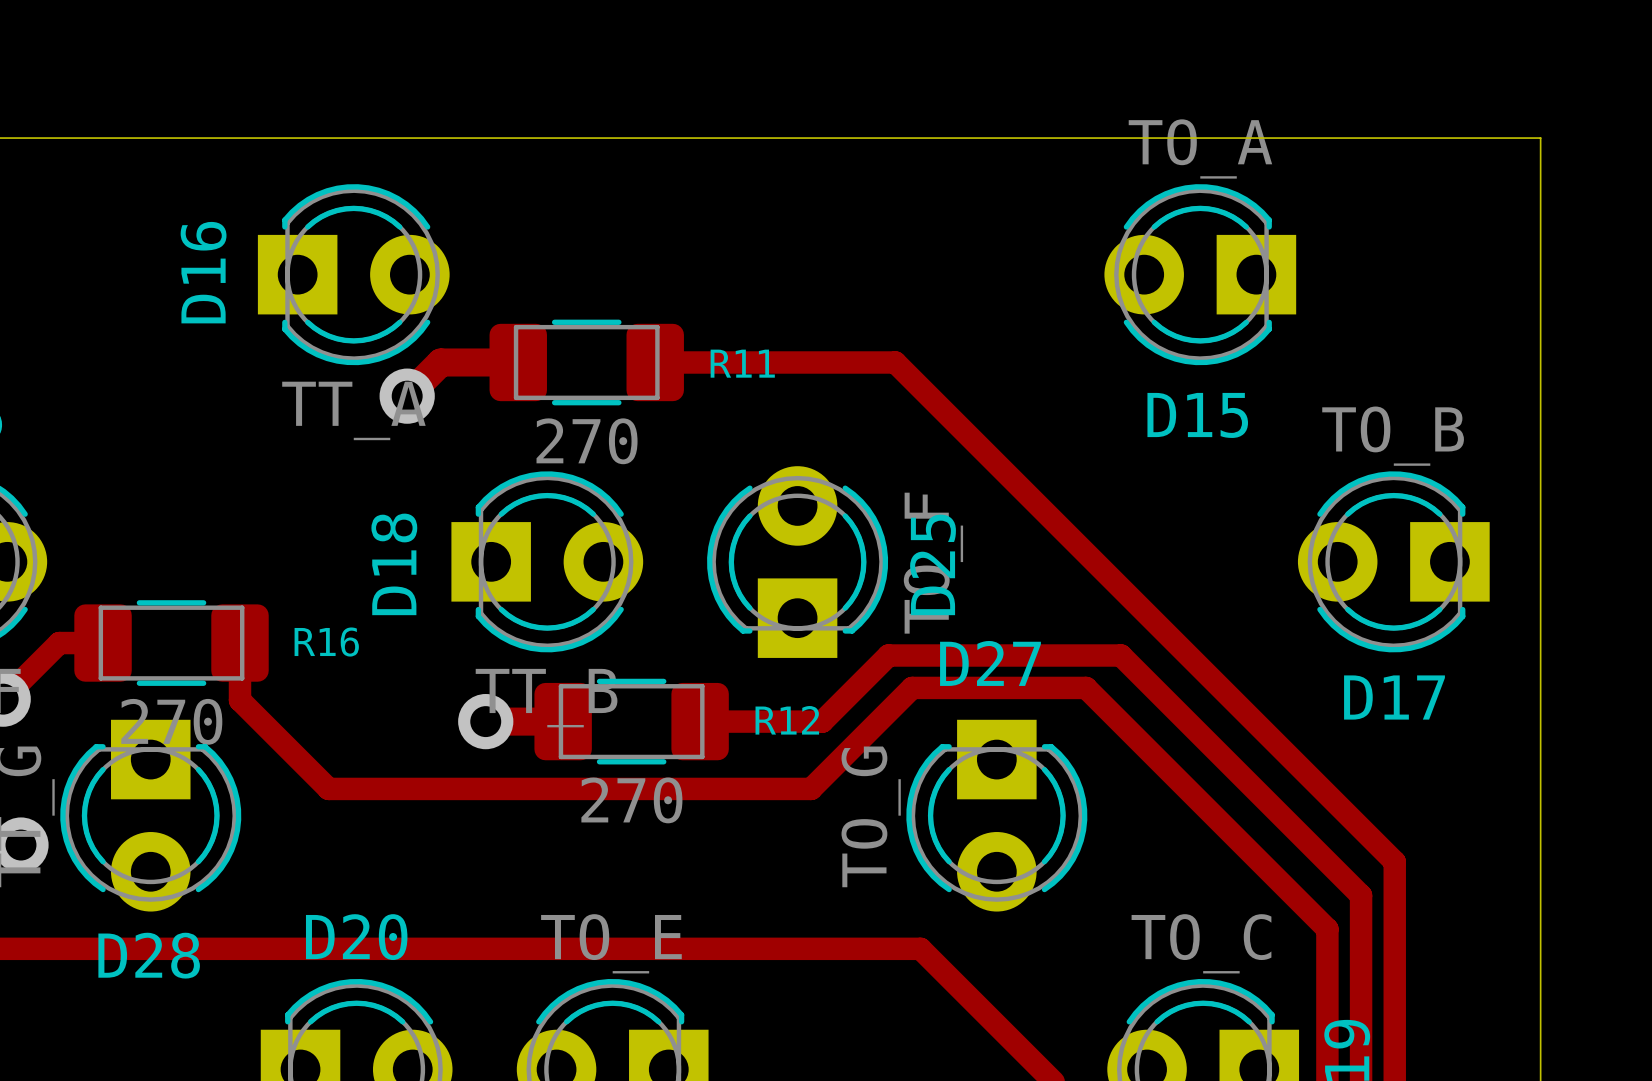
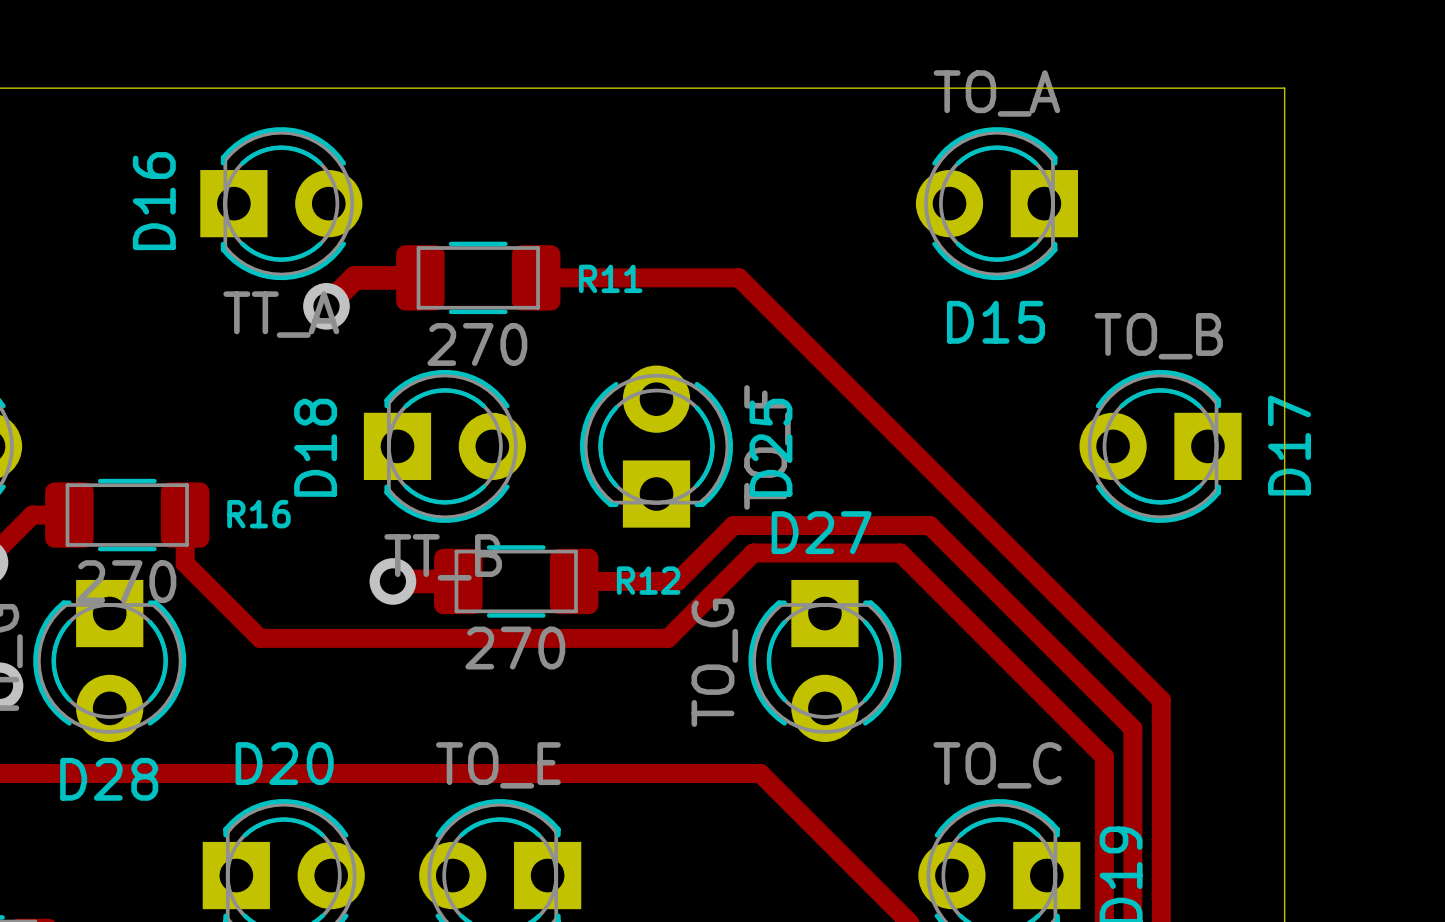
D17 name rotation: 0° (1394, 697) -> 90° counterclockwise (1289, 445)
D17 name position: D17 (1394, 697) -> D17 (1289, 445)

